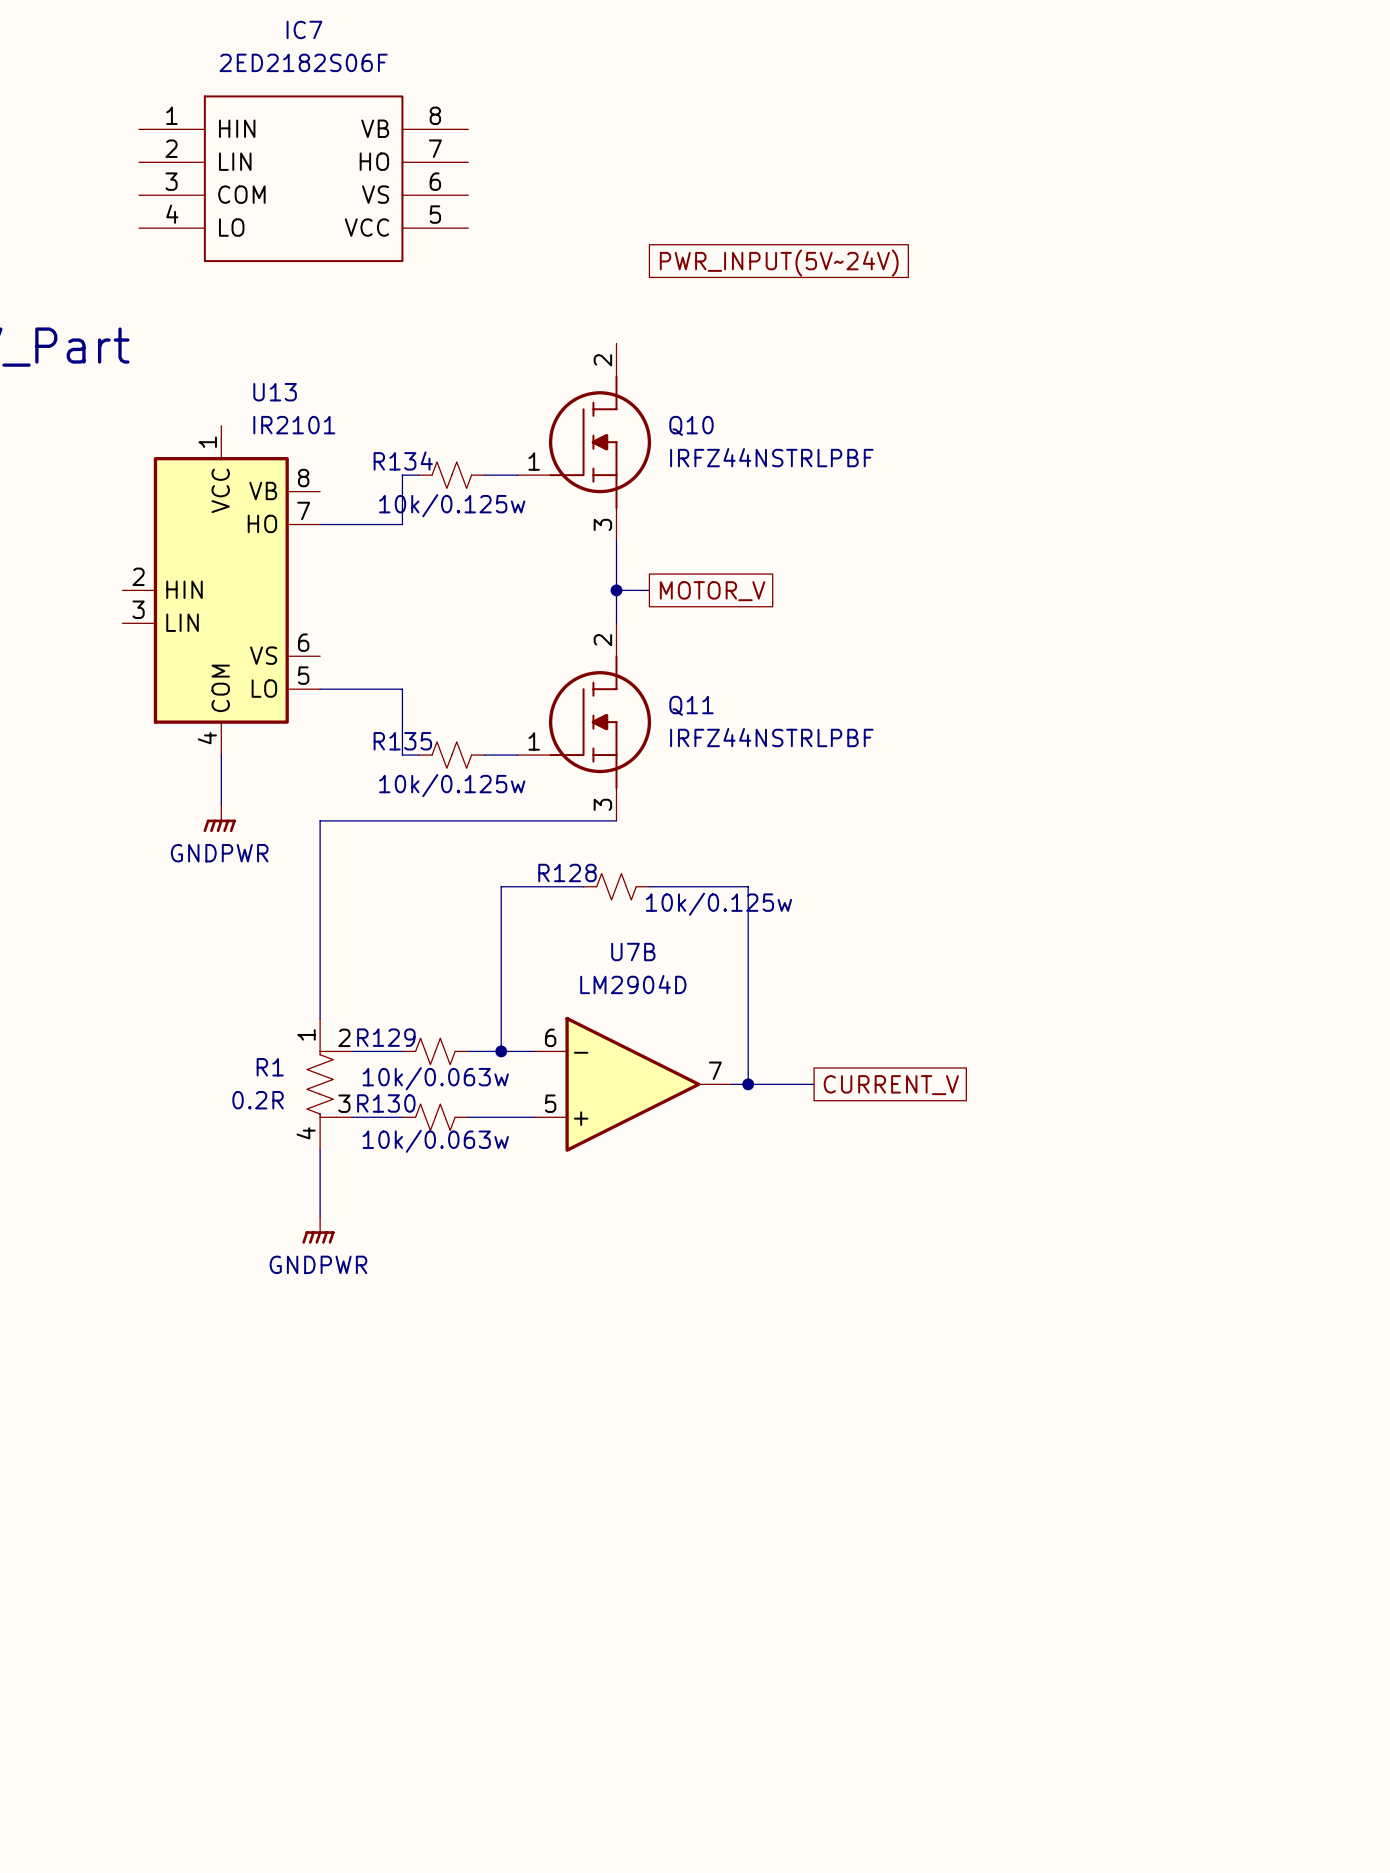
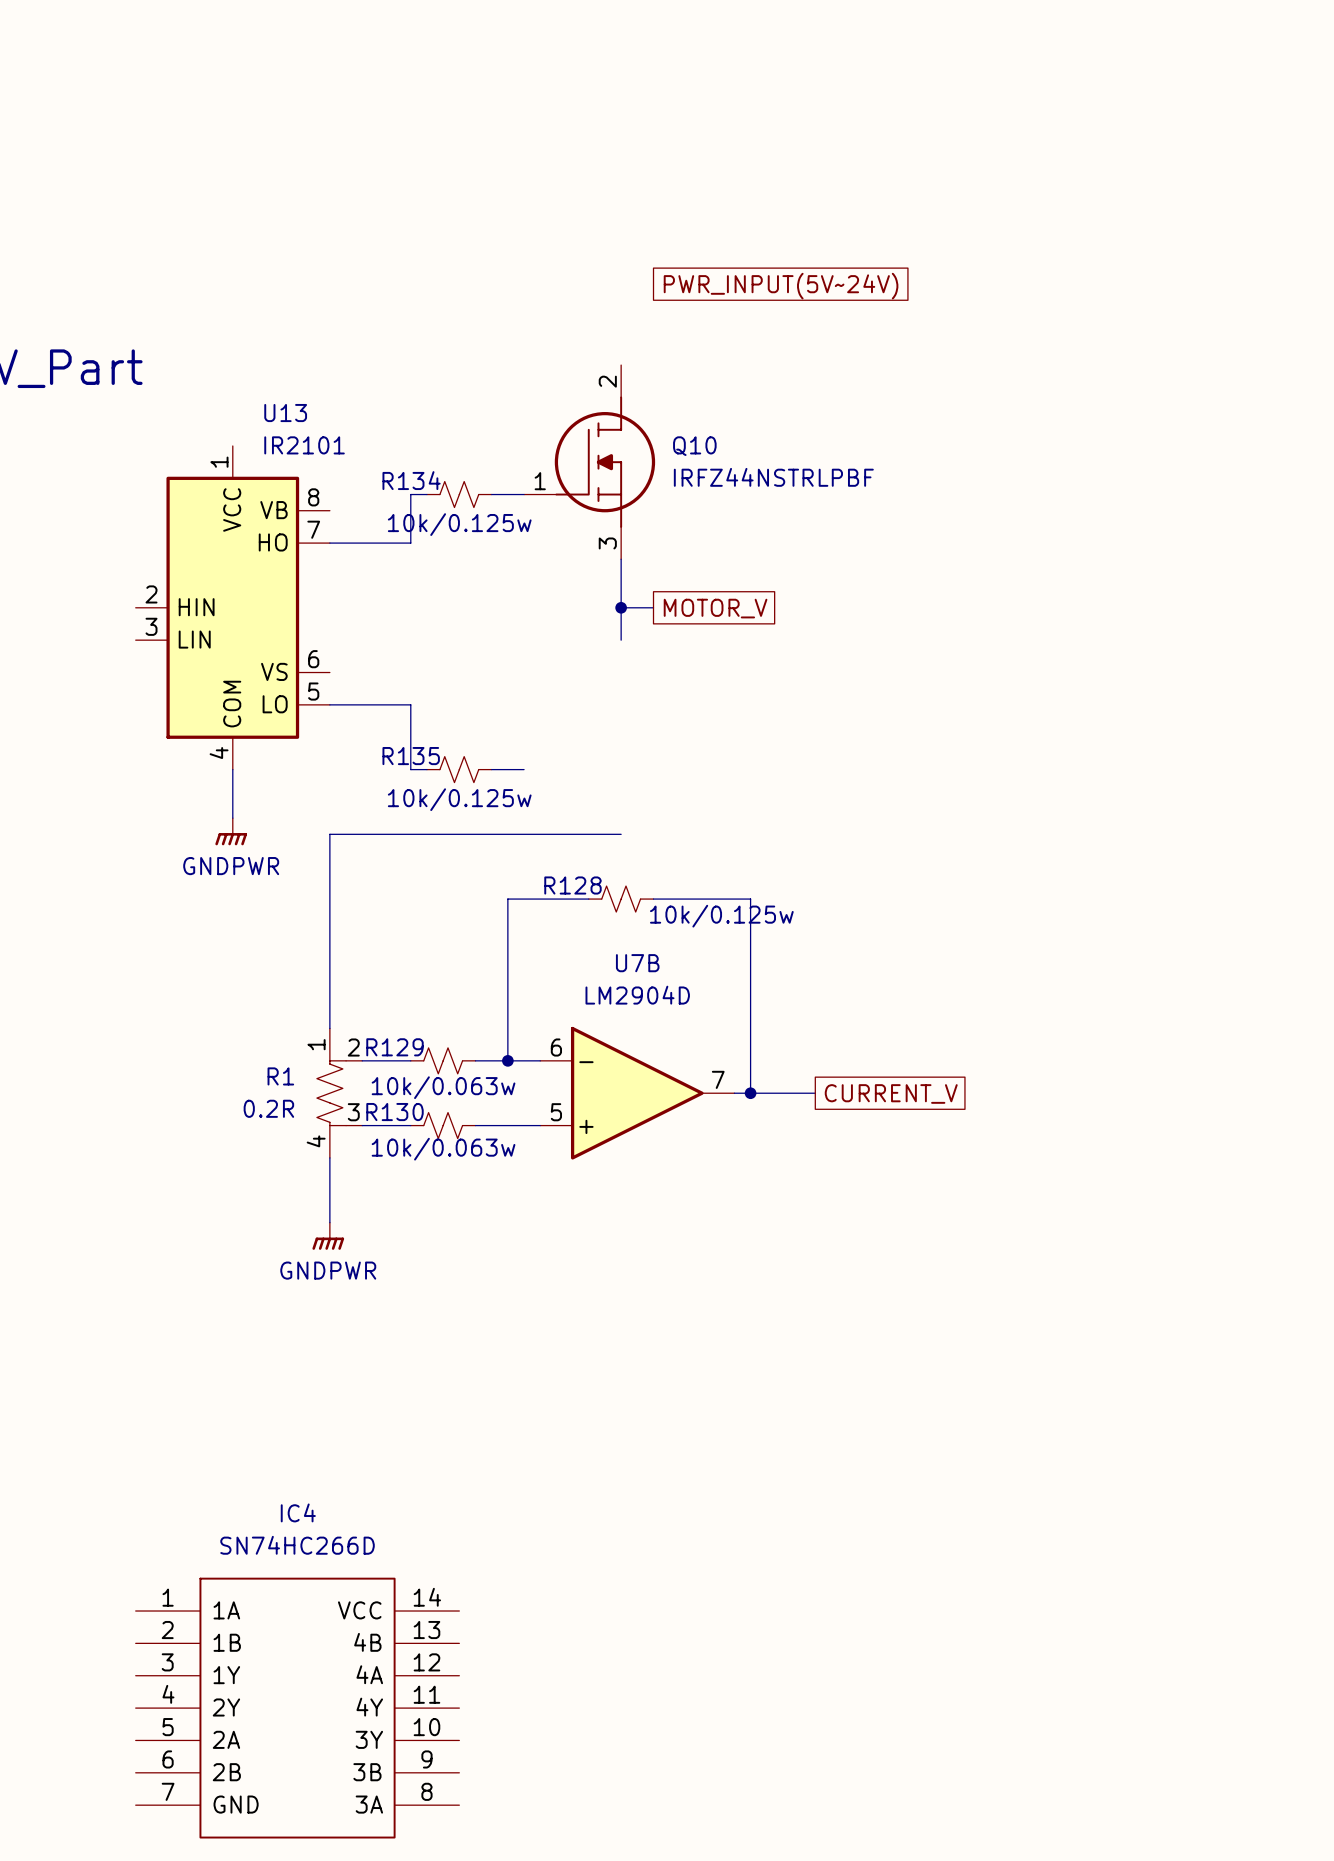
IC7: 2ED2182S06F (303, 178) -> none
Q11: IRFZ44NSTRLPBF (584, 722) -> none
IC4: none -> SN74HC266D (297, 1708)

